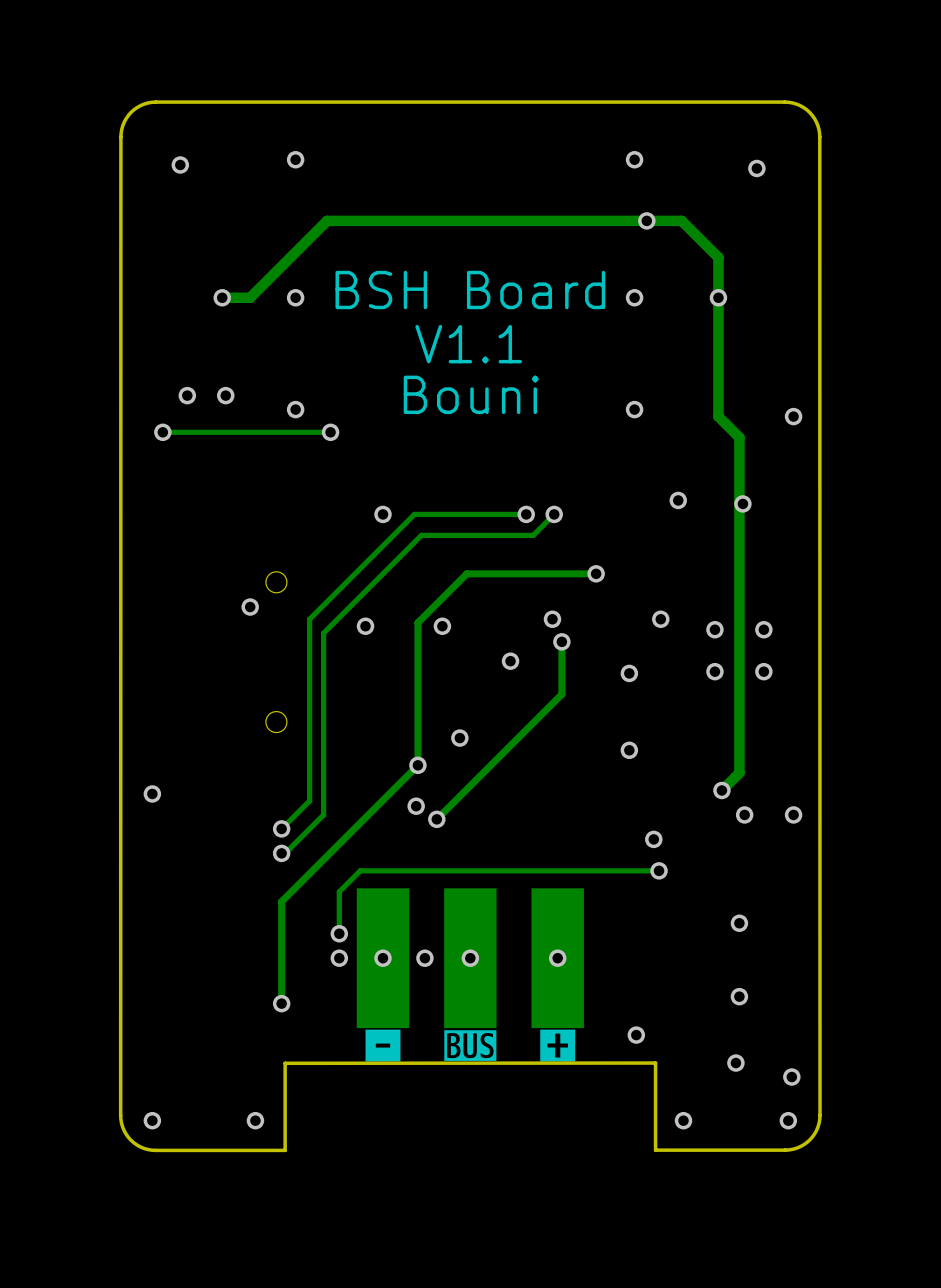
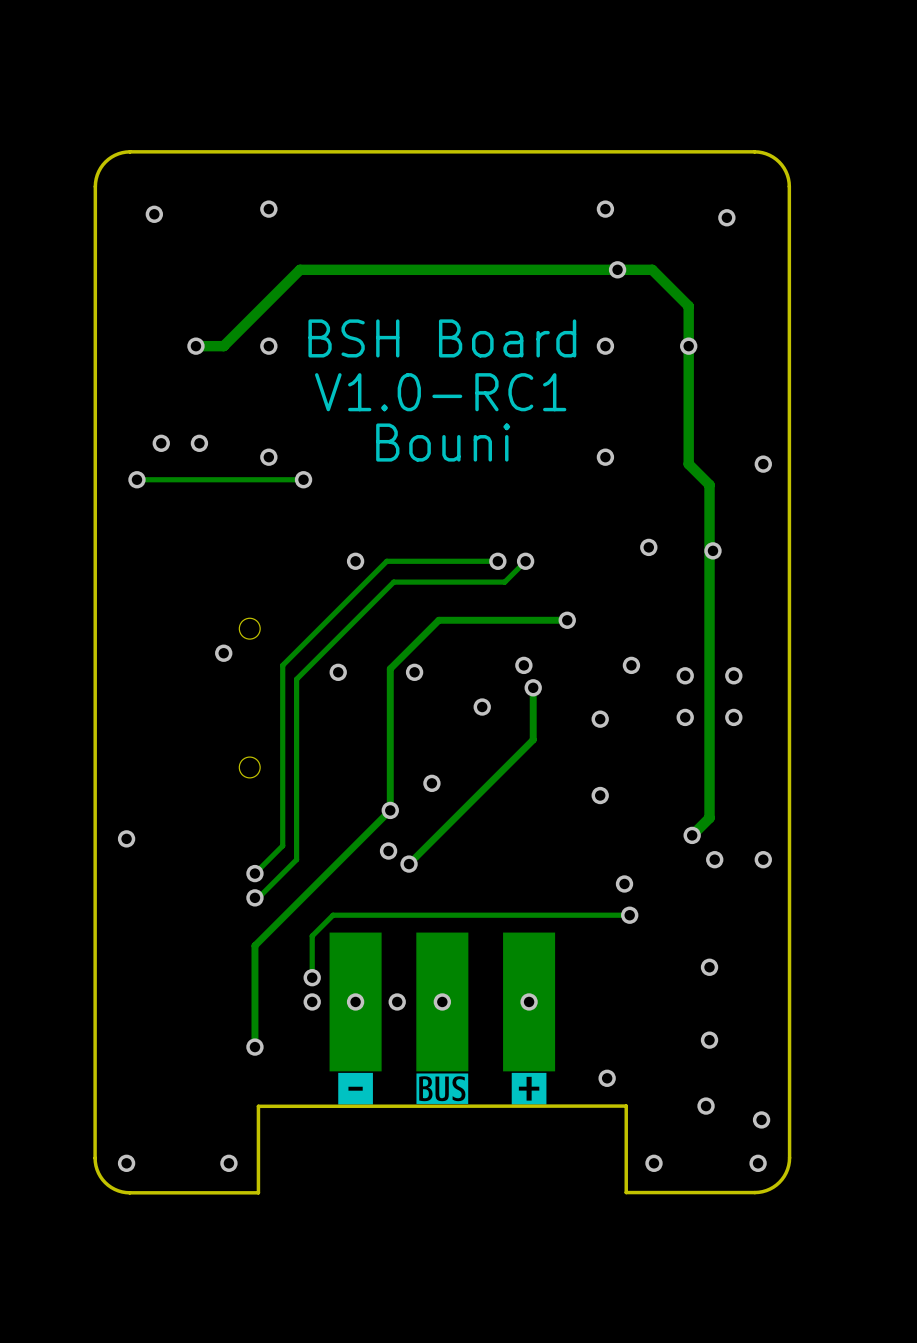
text: V1.1 (468, 344) -> V1.0-RC1 (440, 392)

